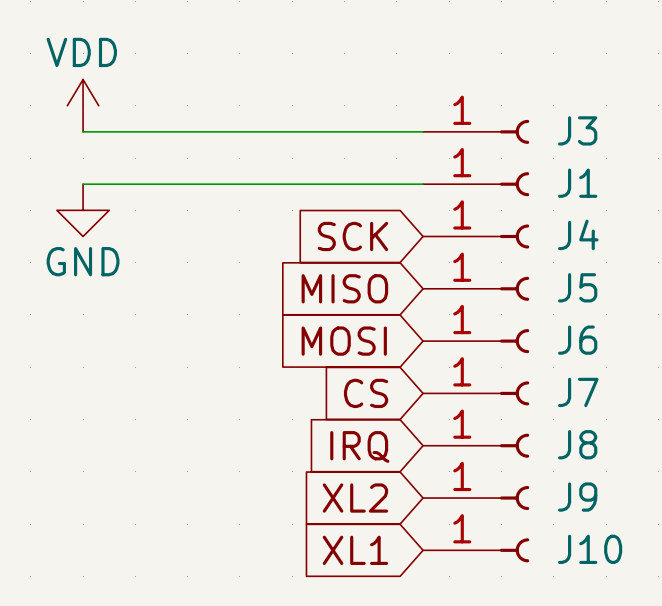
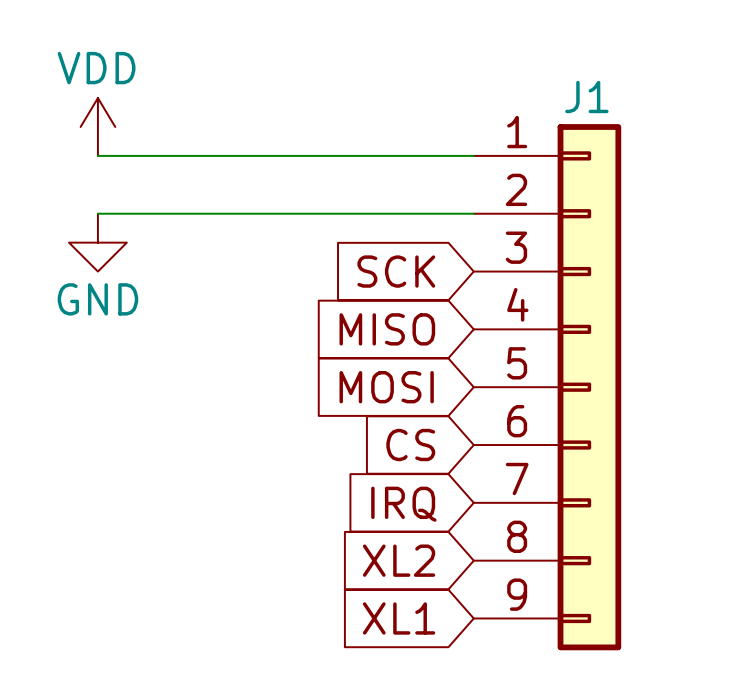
J3: (476, 131) -> none
J1 symbol: [423, 172, 530, 197] -> [473, 124, 622, 651]
J1 name position: J1 (577, 183) -> J1 (586, 97)
J4: (476, 236) -> none
J5: (476, 288) -> none
J6: (476, 341) -> none
J7: (476, 393) -> none
J8: (476, 445) -> none
J9: (476, 498) -> none
J10: (476, 550) -> none

